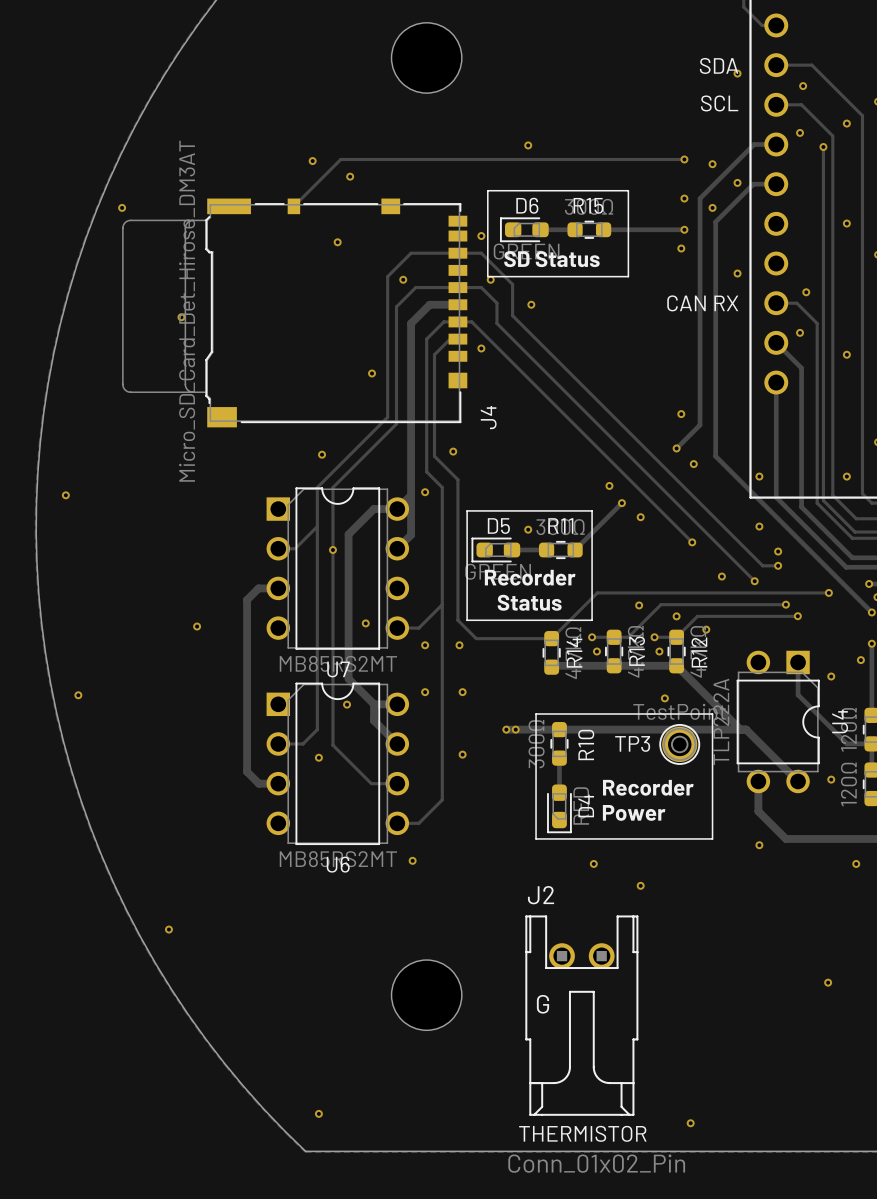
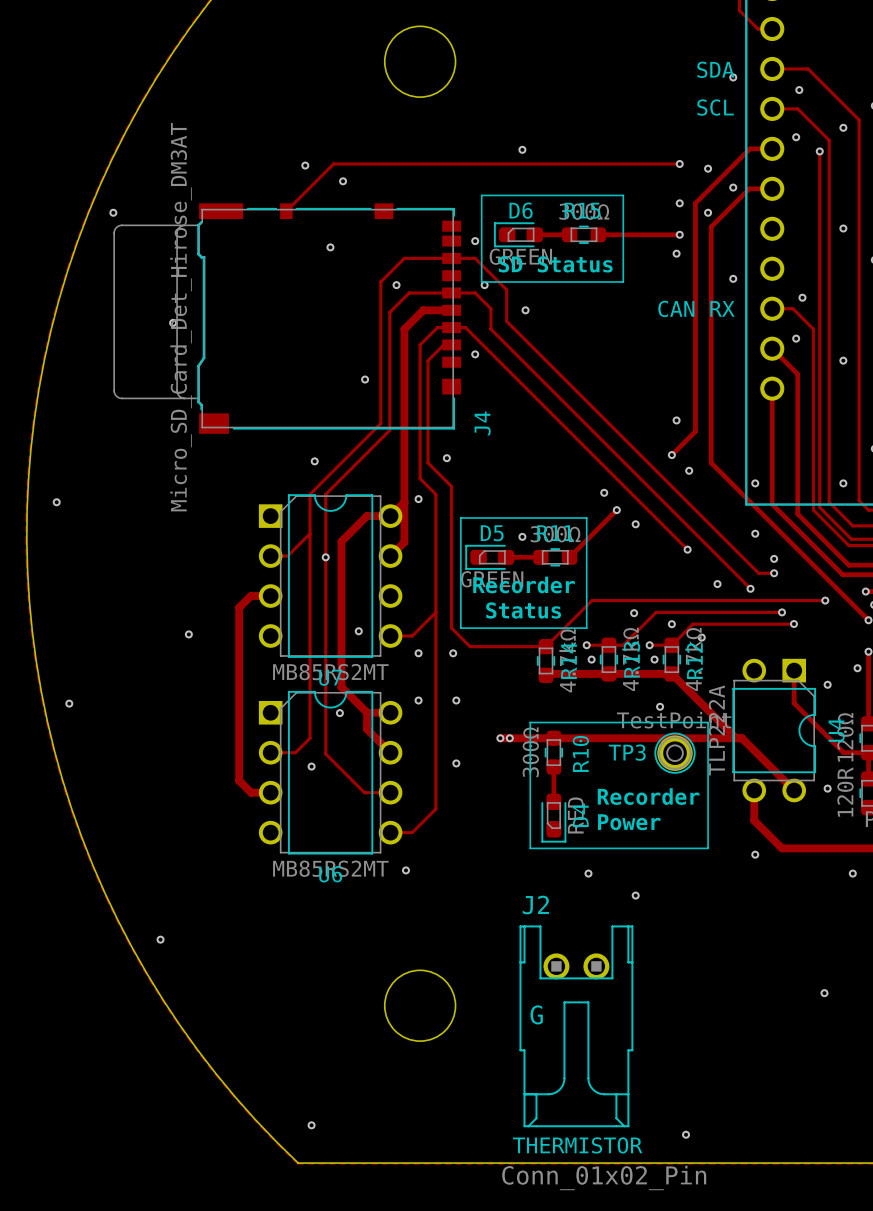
part value: 120Ω (848, 784) -> 120R (845, 792)

